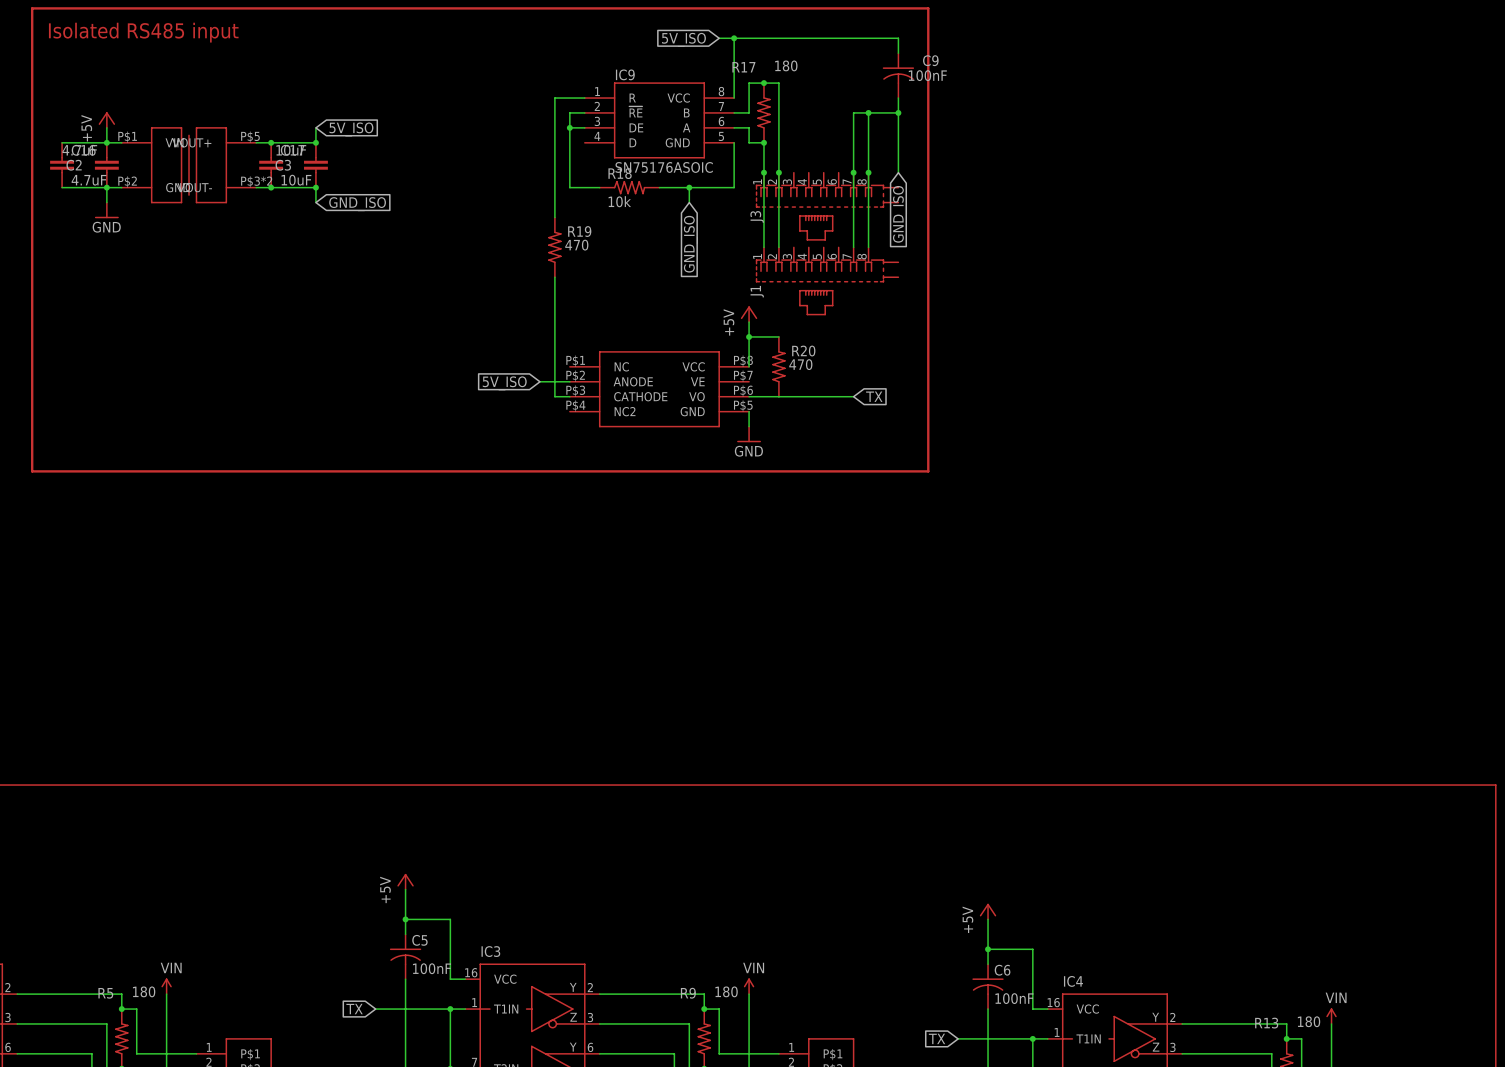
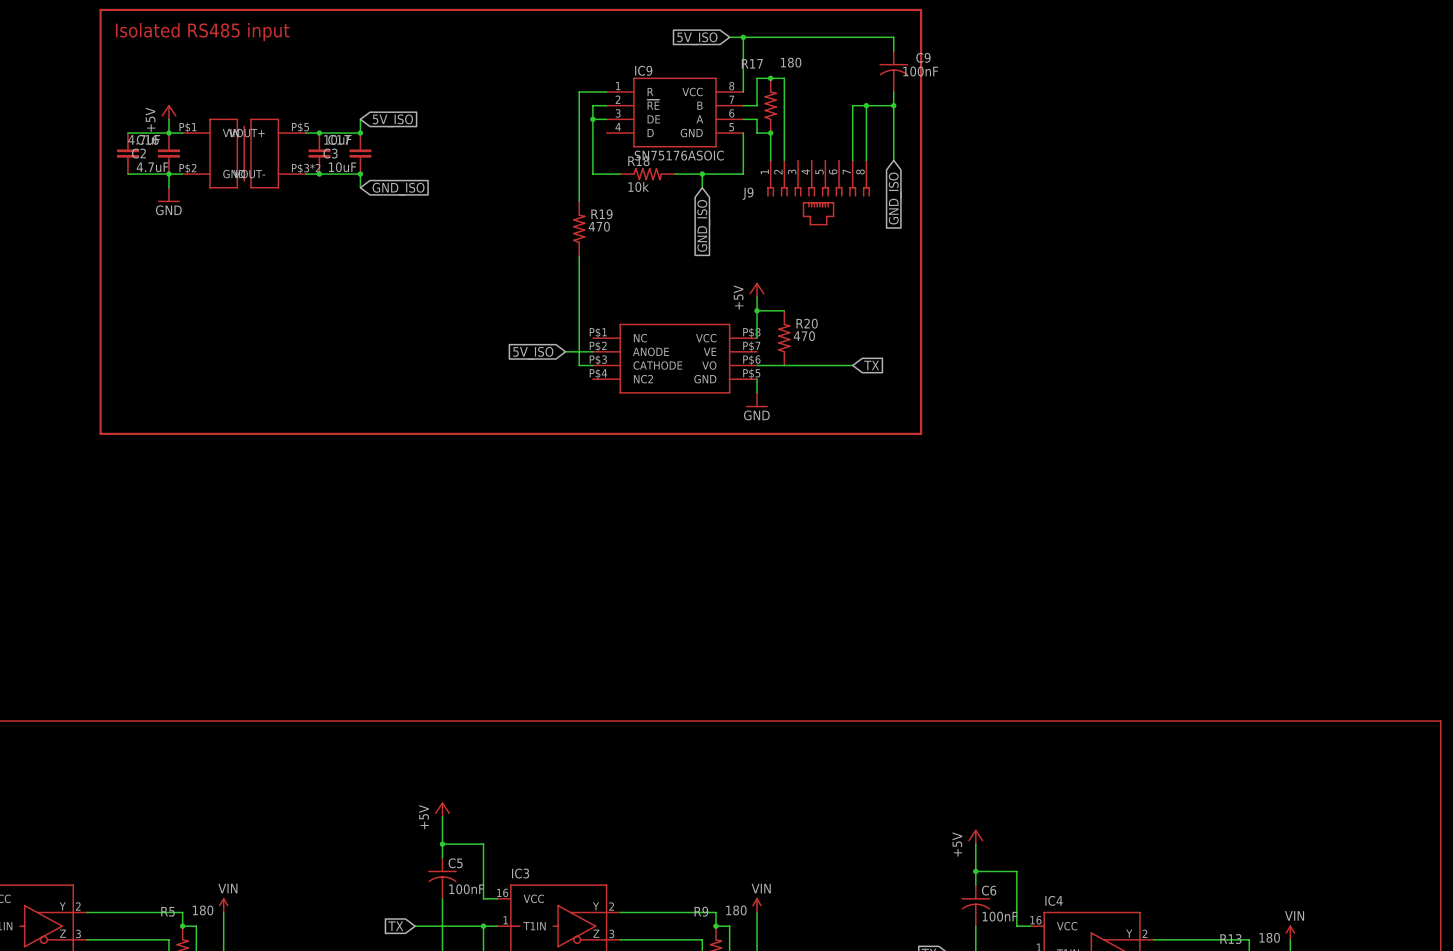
wire: (763, 172) (763, 247) -> none
junction: (763, 172) -> none
wire: (778, 172) (778, 247) -> none
junction: (778, 172) -> none
wire: (853, 172) (853, 247) -> none
junction: (853, 172) -> none
wire: (868, 172) (868, 247) -> none
junction: (868, 172) -> none
J3: (827, 206) -> none
J9: none -> (818, 192)
J1: (827, 281) -> none

